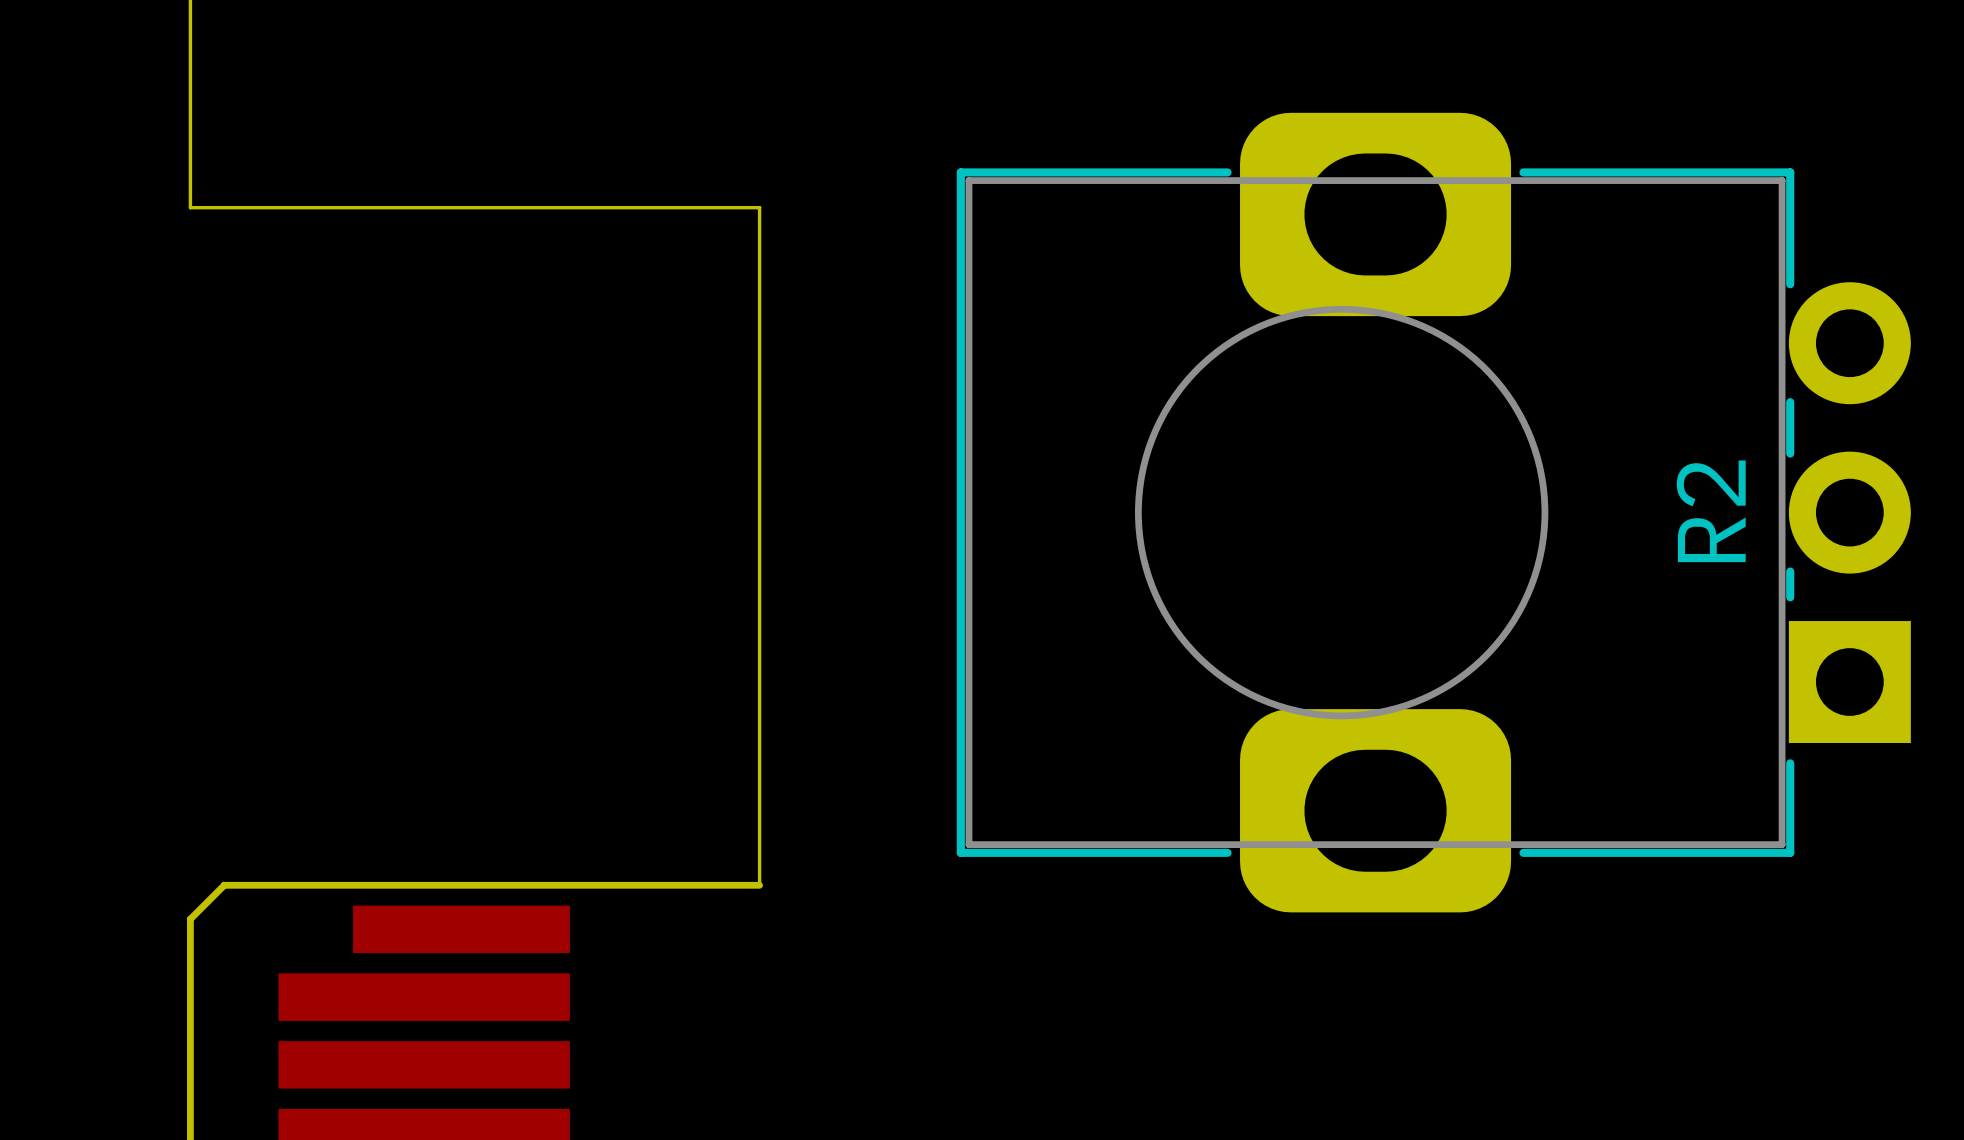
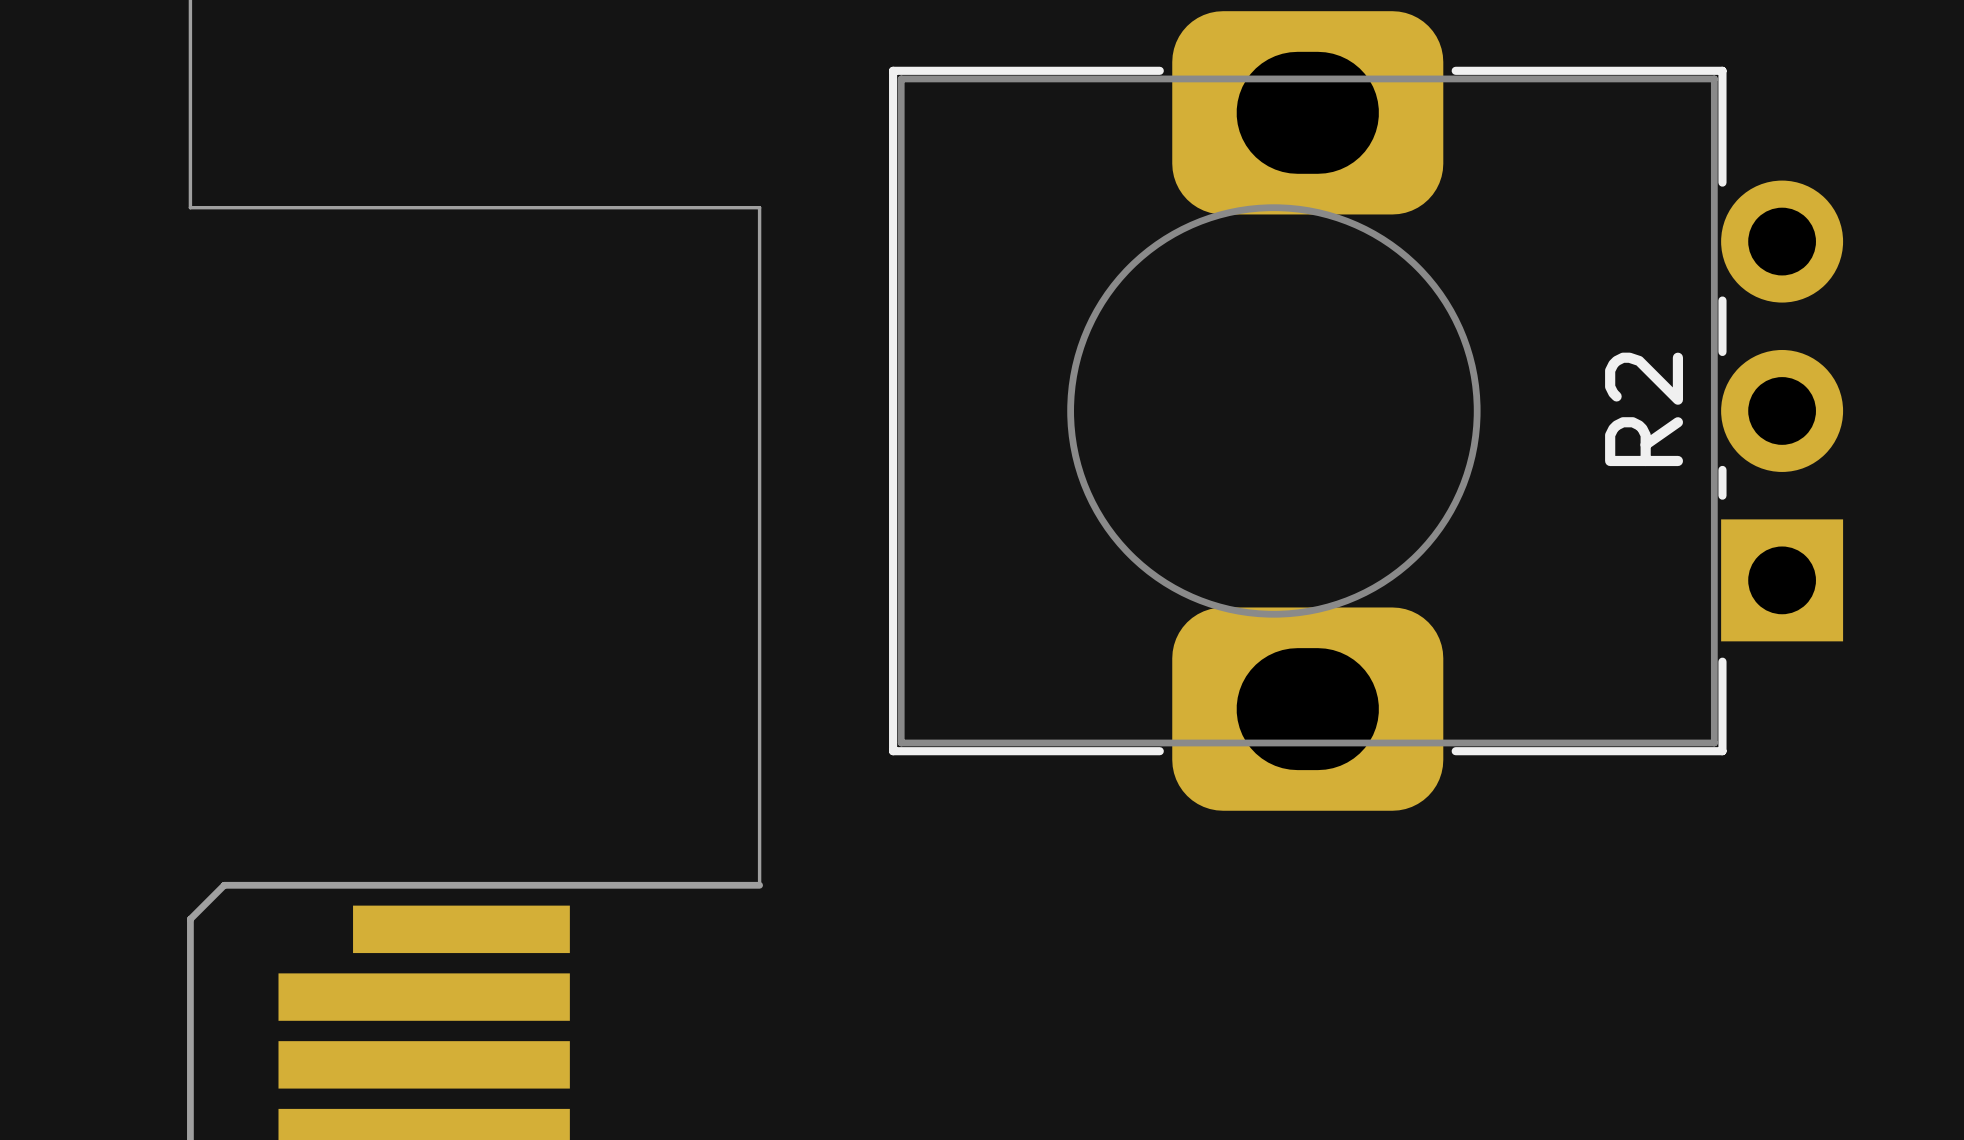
R2 position: (1433, 512) -> (1366, 410)

